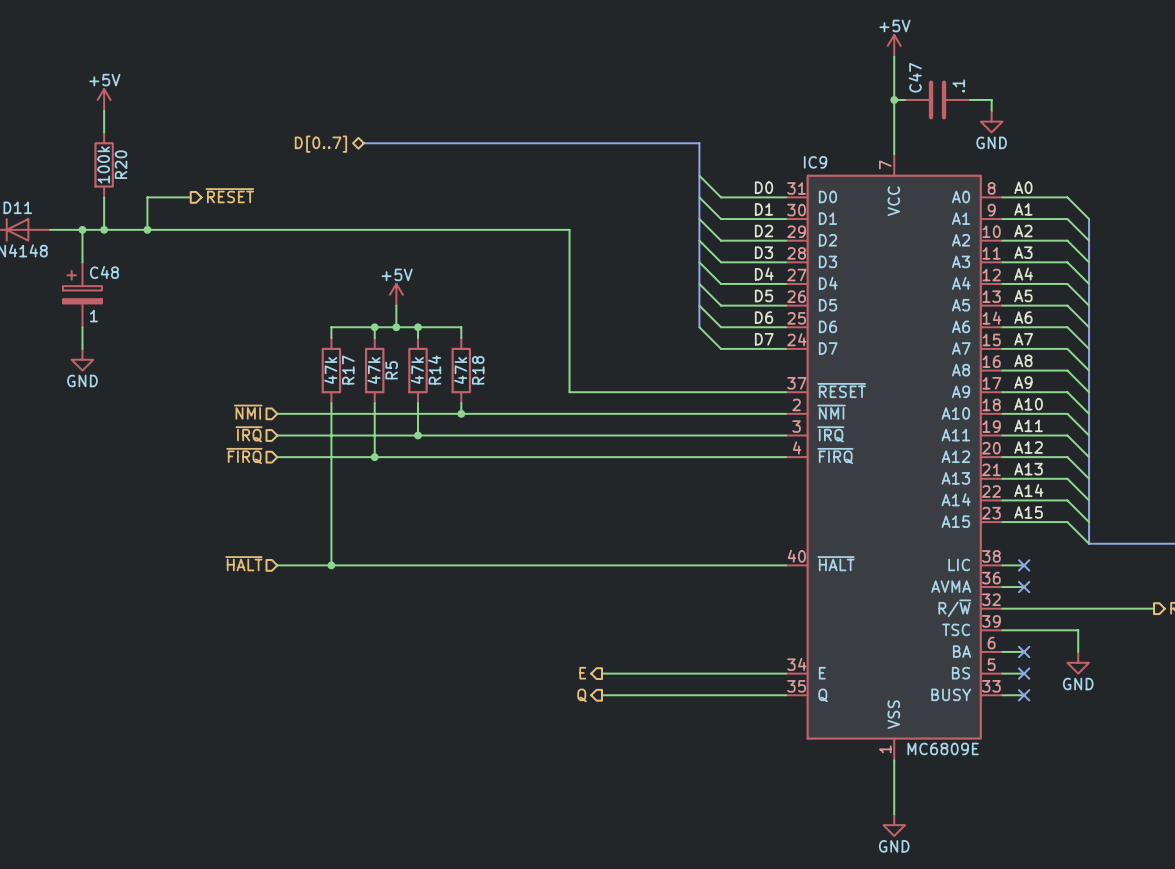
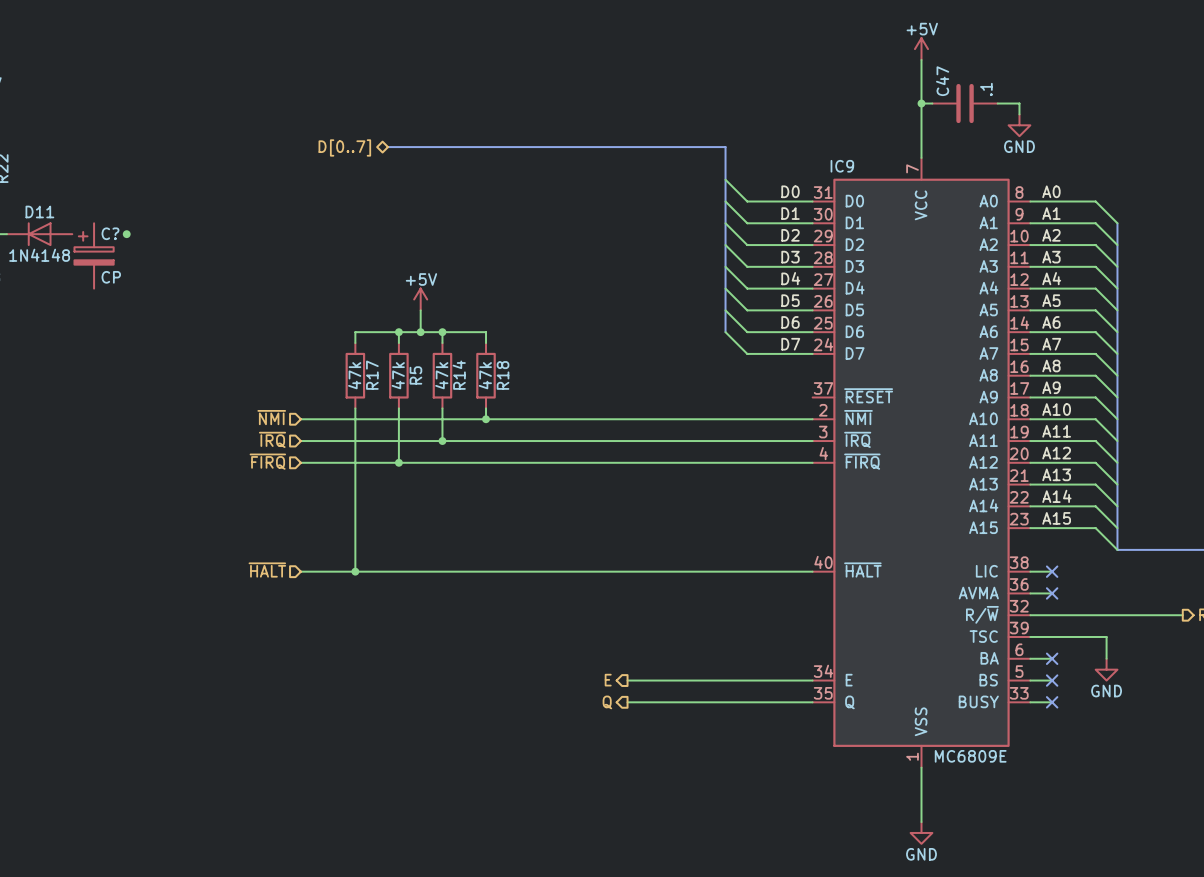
power symbol: +5V (104, 99) -> none
wire: (104, 110) (104, 132) -> none
R20: 100k (104, 164) -> none
hierarchical label: ~{RESET} (229, 195) -> none
wire: (104, 197) (104, 229) -> none
wire: (190, 197) (147, 197) (147, 229) -> none
wire: (50, 229) (569, 229) (569, 392) (786, 392) -> none
wire: (82, 229) (82, 262) -> none
junction: (82, 229) -> none
junction: (147, 229) -> none
C?: none -> CP (94, 255)
C48: 1 (82, 294) -> none
wire: (82, 327) (82, 348) -> none
power symbol: GND (82, 359) -> none

